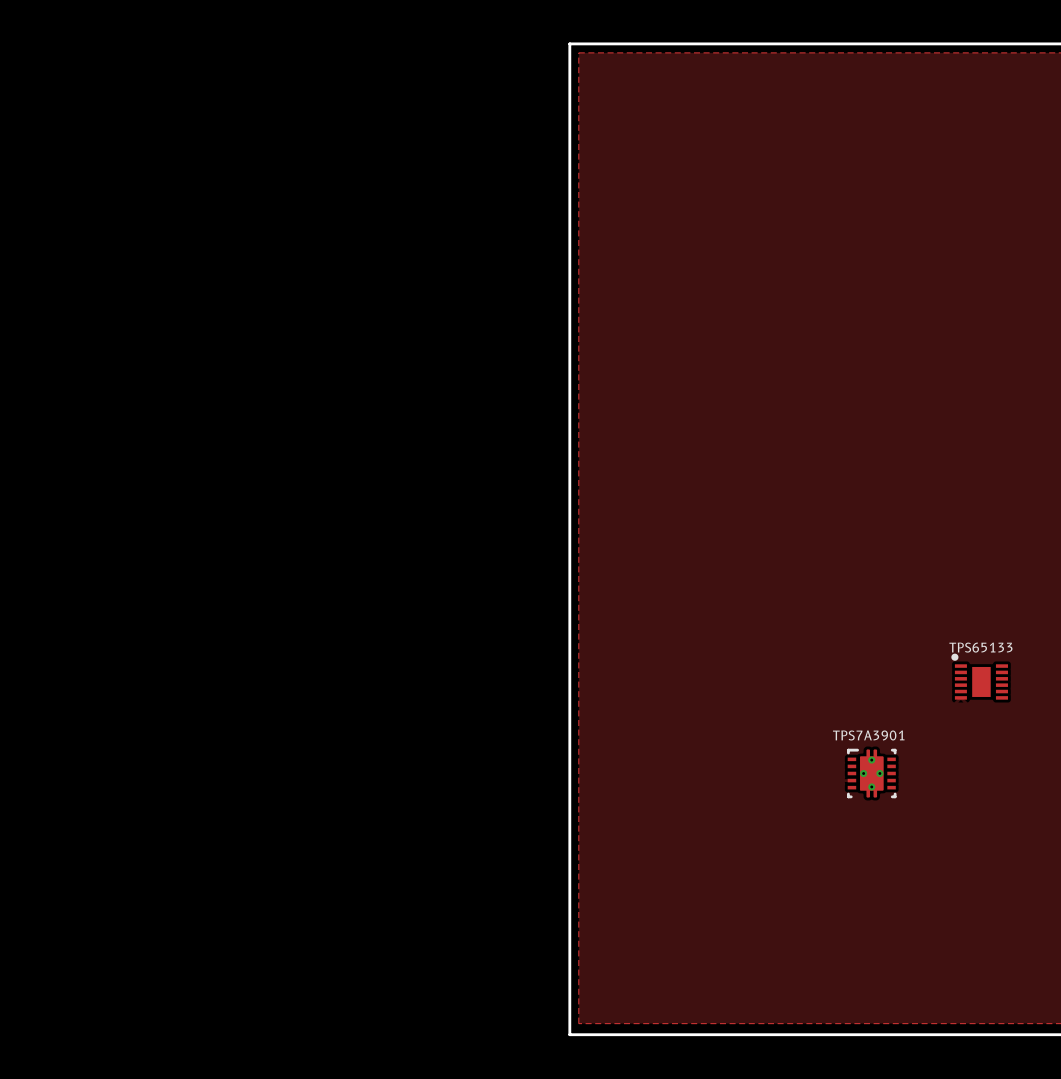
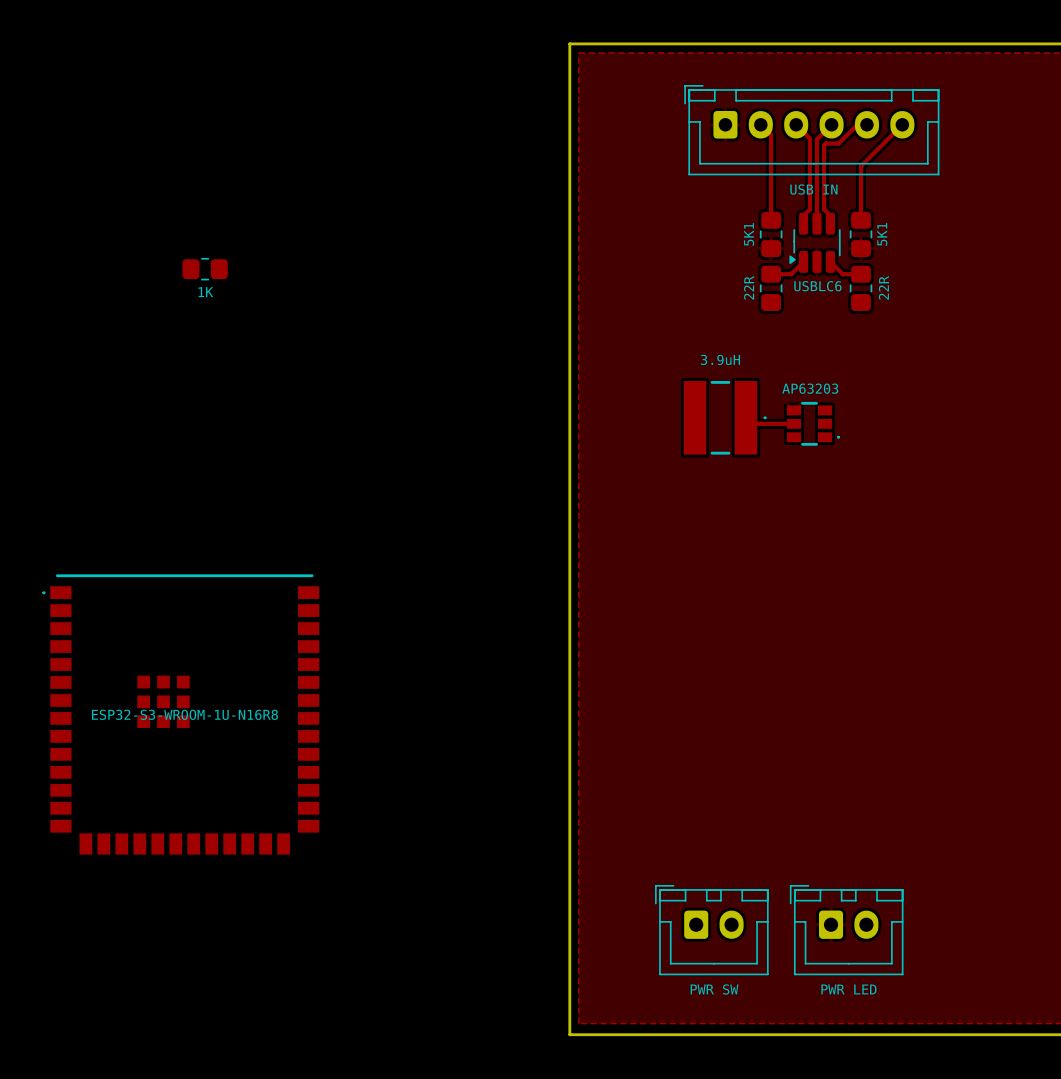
track: none -> (796, 124) (809, 138) (809, 209) (803, 215) (803, 223)
track: none -> (831, 124) (817, 139) (817, 223)
track: none -> (866, 124) (857, 124) (838, 143) (826, 143) (824, 145) (824, 209) (830, 215) (830, 223)
track: none -> (902, 124) (861, 166) (861, 220)
track: none -> (760, 125) (771, 135) (771, 220)
part: none -> USB IN (811, 130)
part: none -> 5K1 (771, 234)
part: none -> 5K1 (861, 234)
part: none -> USBLC6 (815, 242)
track: none -> (803, 261) (791, 274) (771, 274)
track: none -> (830, 261) (842, 274) (861, 274)
part: none -> 1K (205, 269)
part: none -> 22R (771, 288)
part: none -> 22R (861, 288)
part: none -> 3.9uH (725, 417)
track: none -> (745, 417) (751, 423) (793, 423)
part: none -> AP63203 (813, 423)
part: TPS65133 (979, 676) -> none
part: none -> ESP32-S3-WROOM-1U-N16R8 (180, 714)
part: TPS7A3901 (871, 773) -> none
part: none -> PWR SW (711, 930)
part: none -> PWR LED (846, 930)

